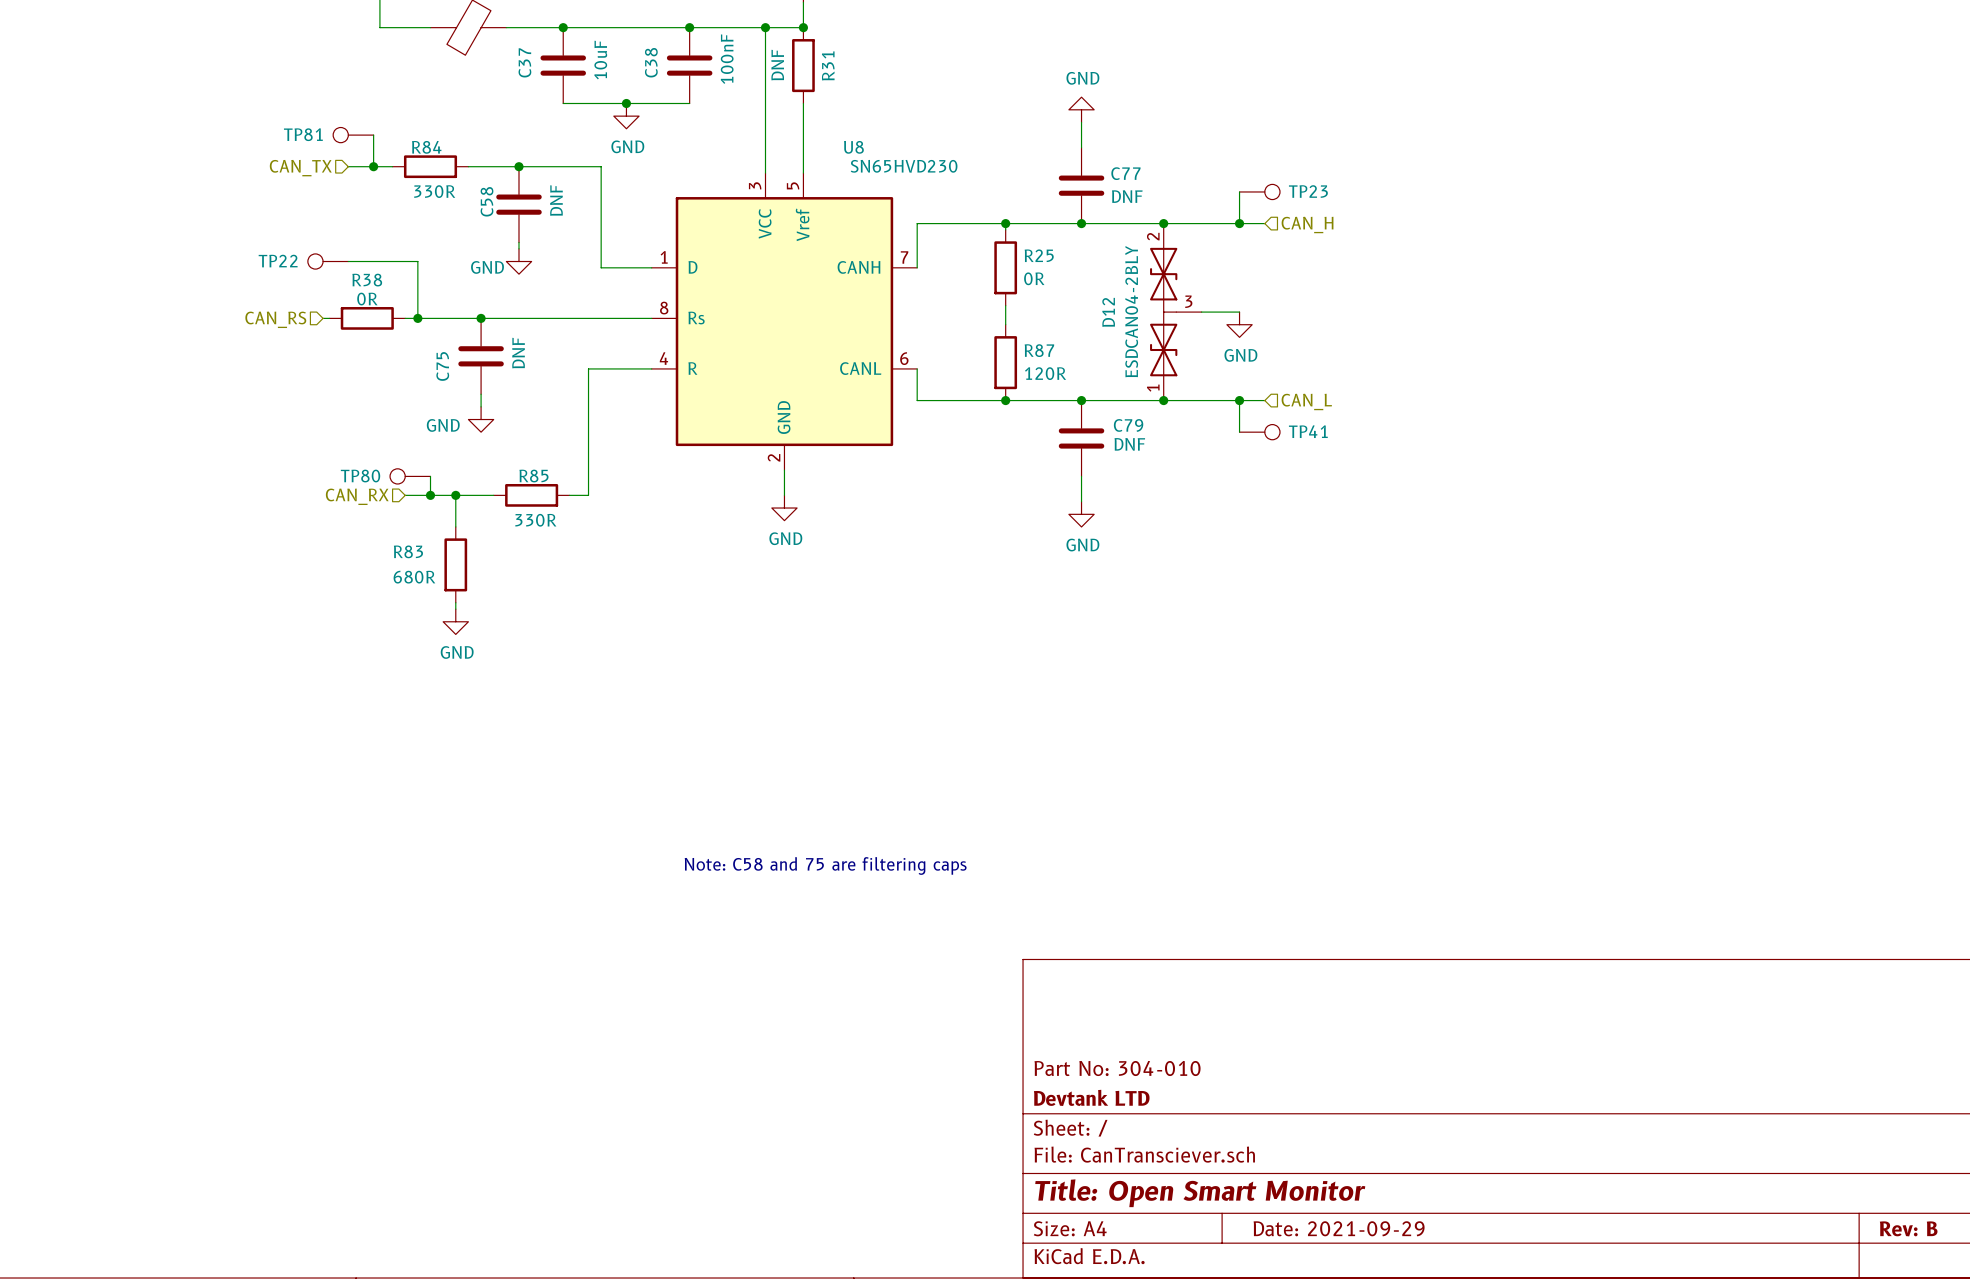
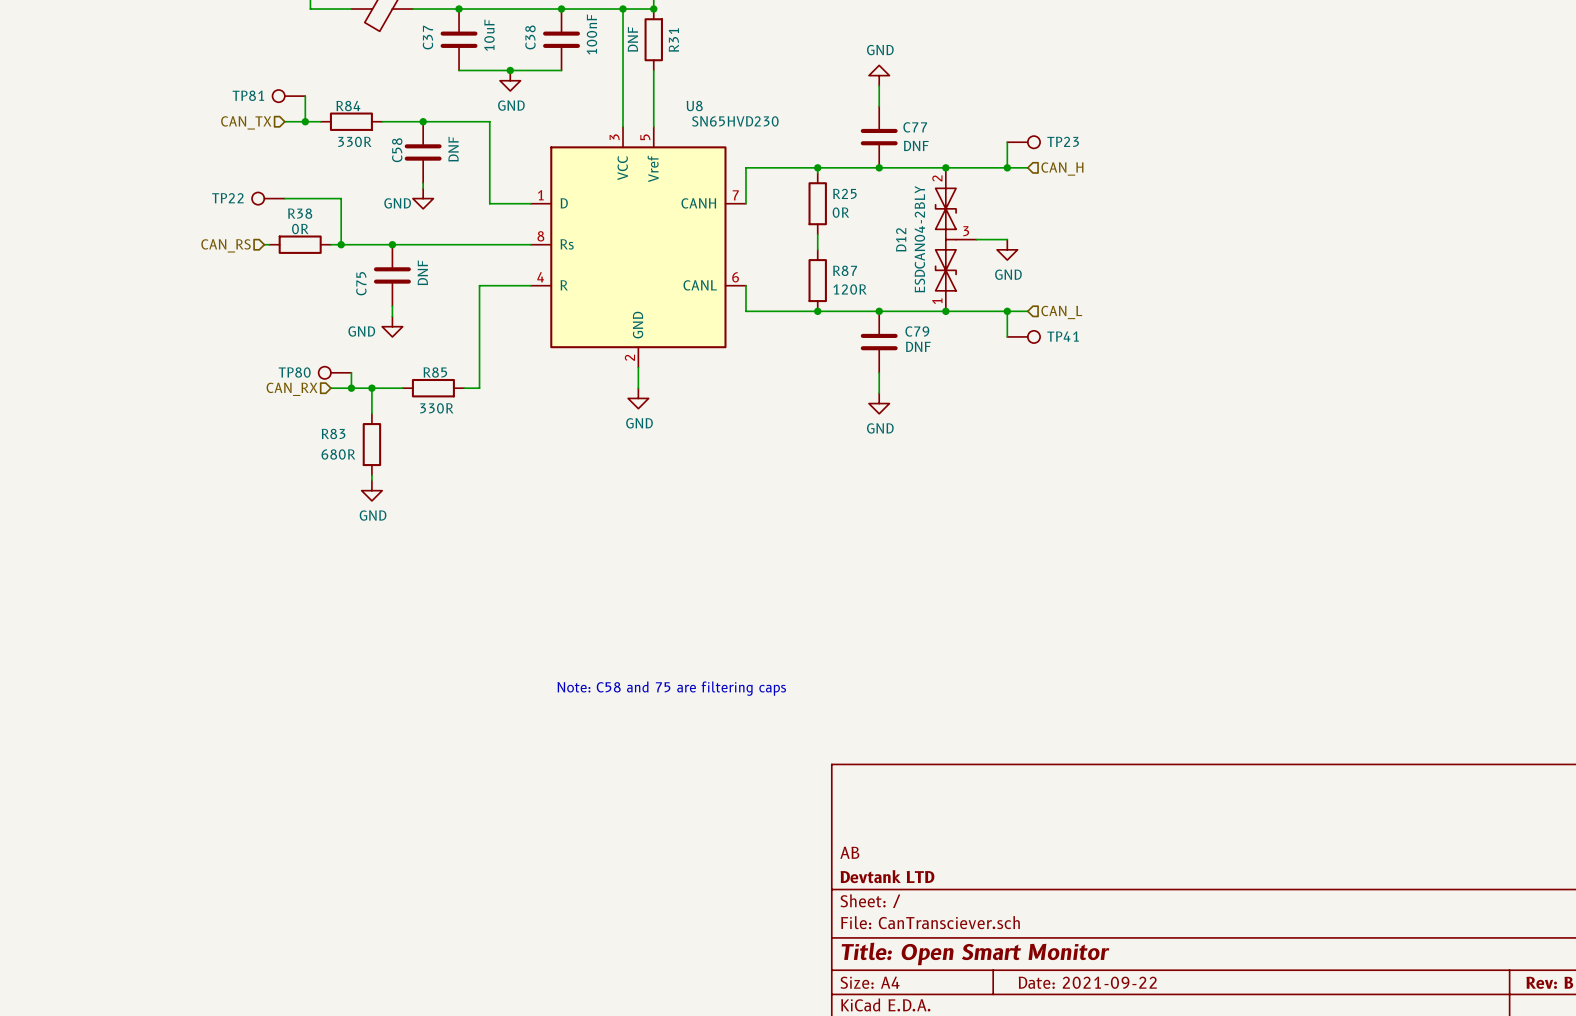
title block: Part No: 304-010 (1117, 1068) -> AB (849, 852)
title block: Date: 2021-09-29 (1339, 1228) -> Date: 2021-09-22 (1087, 982)

